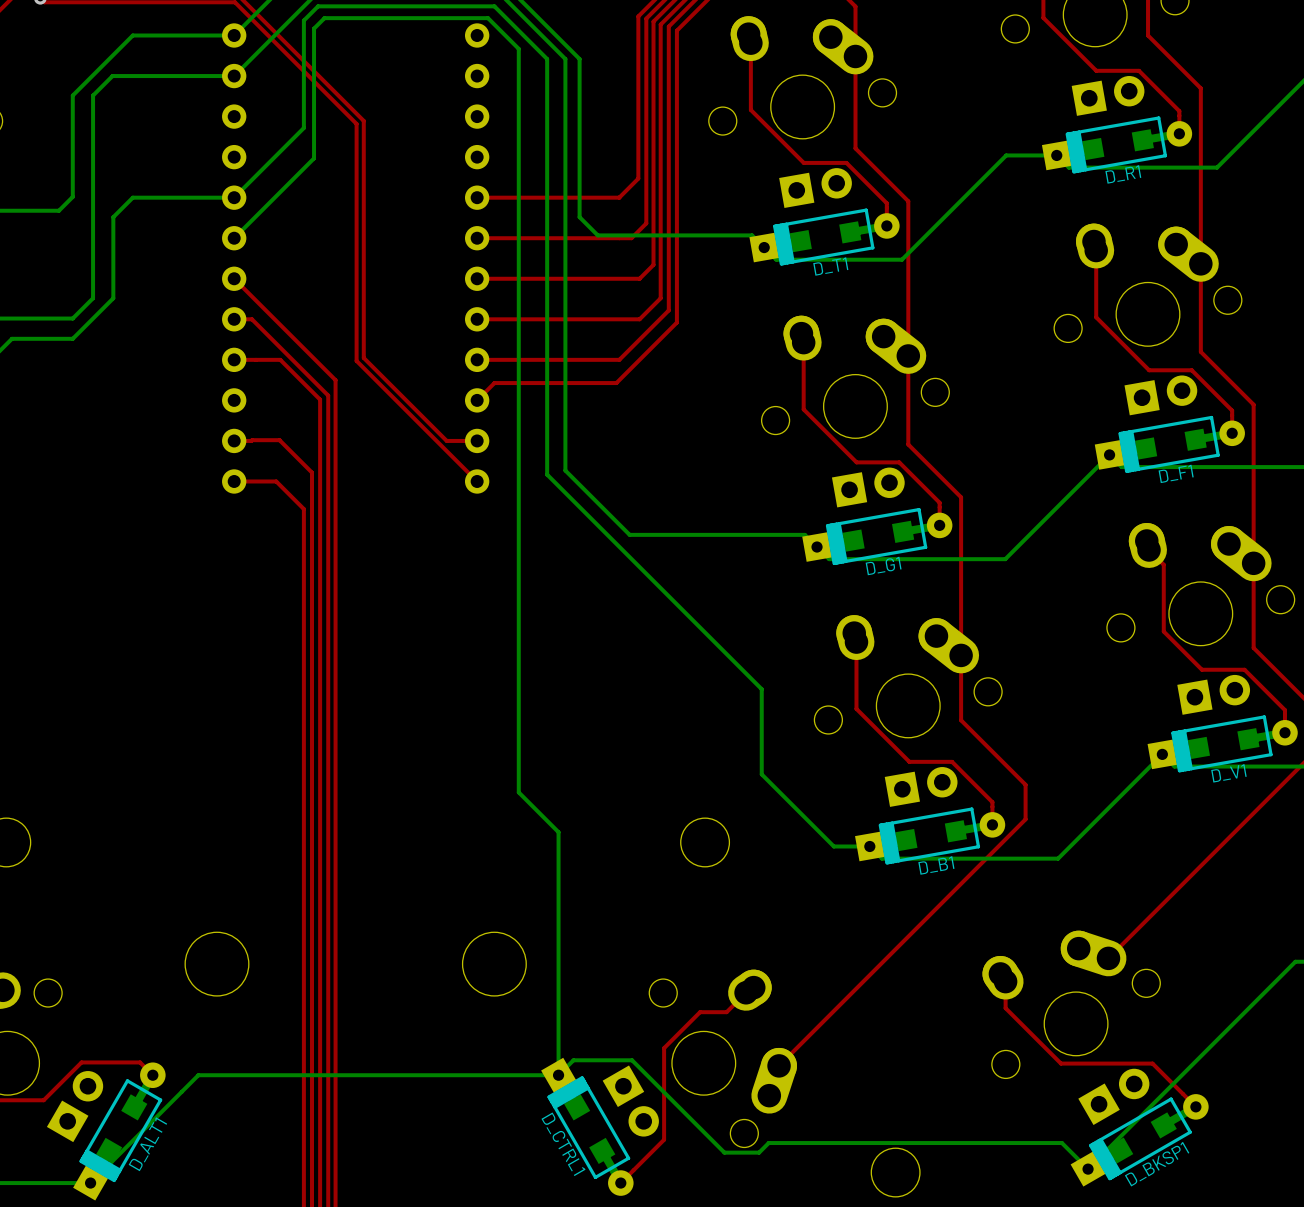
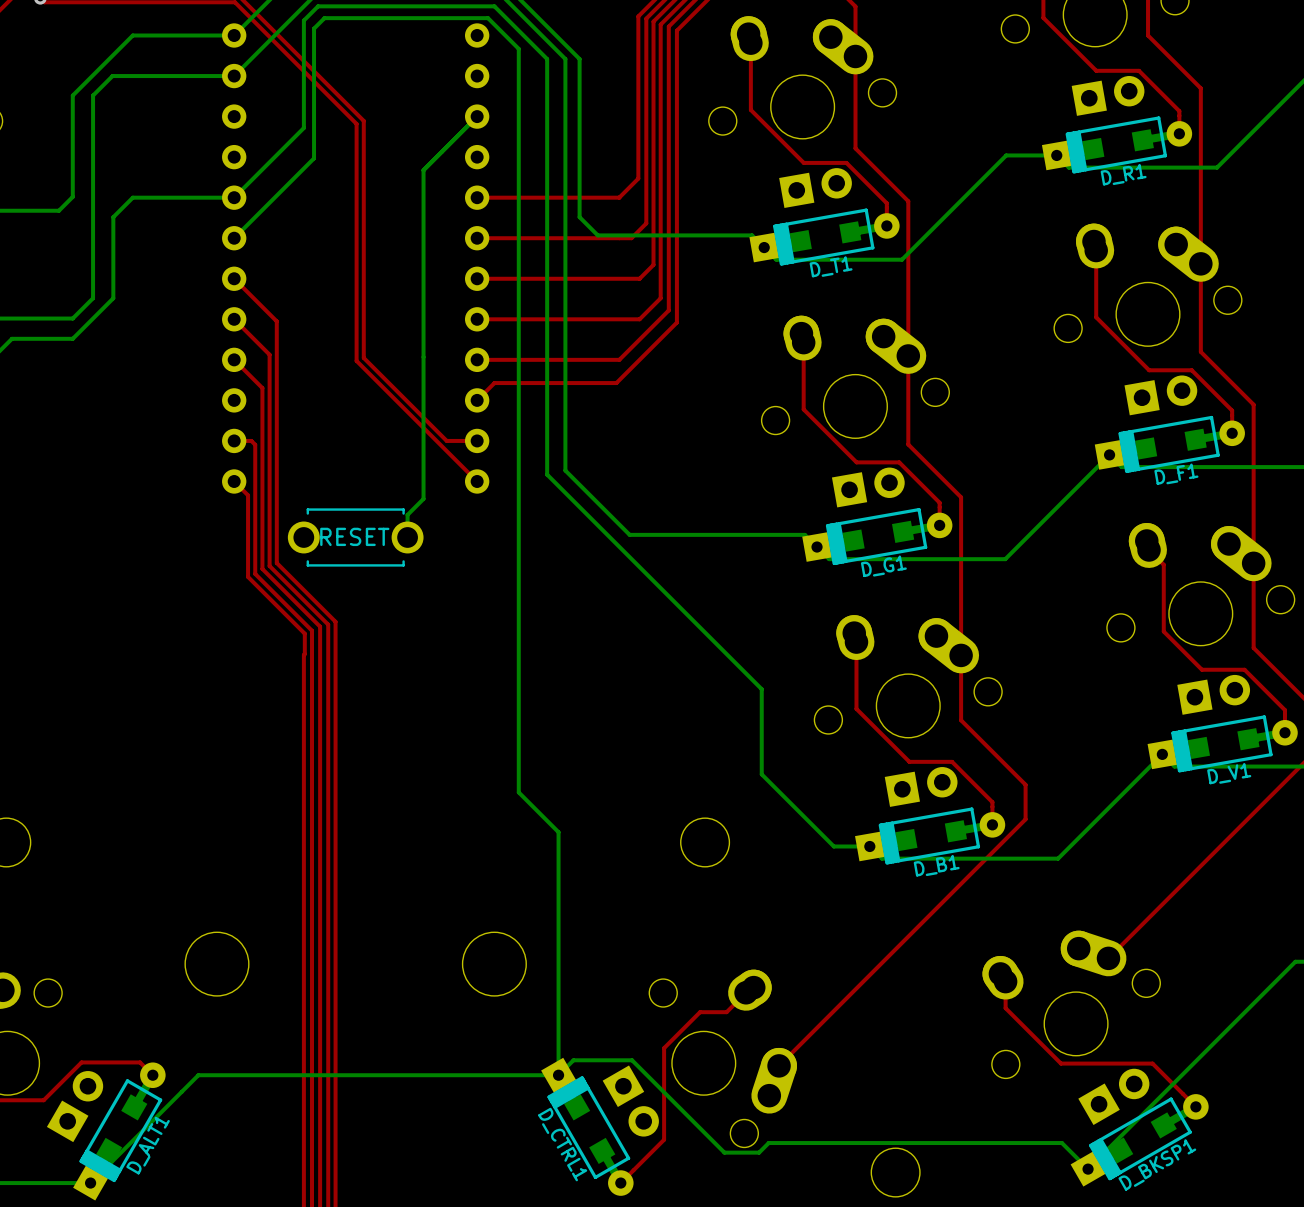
bottom track: none -> (477, 116) (423, 170) (423, 498) (407, 514) (407, 537)
top track: (234, 319) (251, 319) (328, 395) (328, 624) -> (234, 319) (269, 354) (269, 566) (328, 624)
top track: (276, 321) (335, 380) (335, 621) -> (276, 321) (276, 563) (335, 621)
top track: (234, 359) (280, 359) (320, 399) (320, 626) -> (234, 359) (262, 388) (262, 568) (320, 626)
top track: (251, 440) (279, 440) (312, 472) (312, 630) -> (251, 440) (255, 444) (255, 573) (312, 630)
top track: (234, 481) (276, 481) (303, 509) (303, 655) -> (234, 481) (248, 495) (248, 576) (304, 633) (303, 655)
part: none -> (355, 537)

